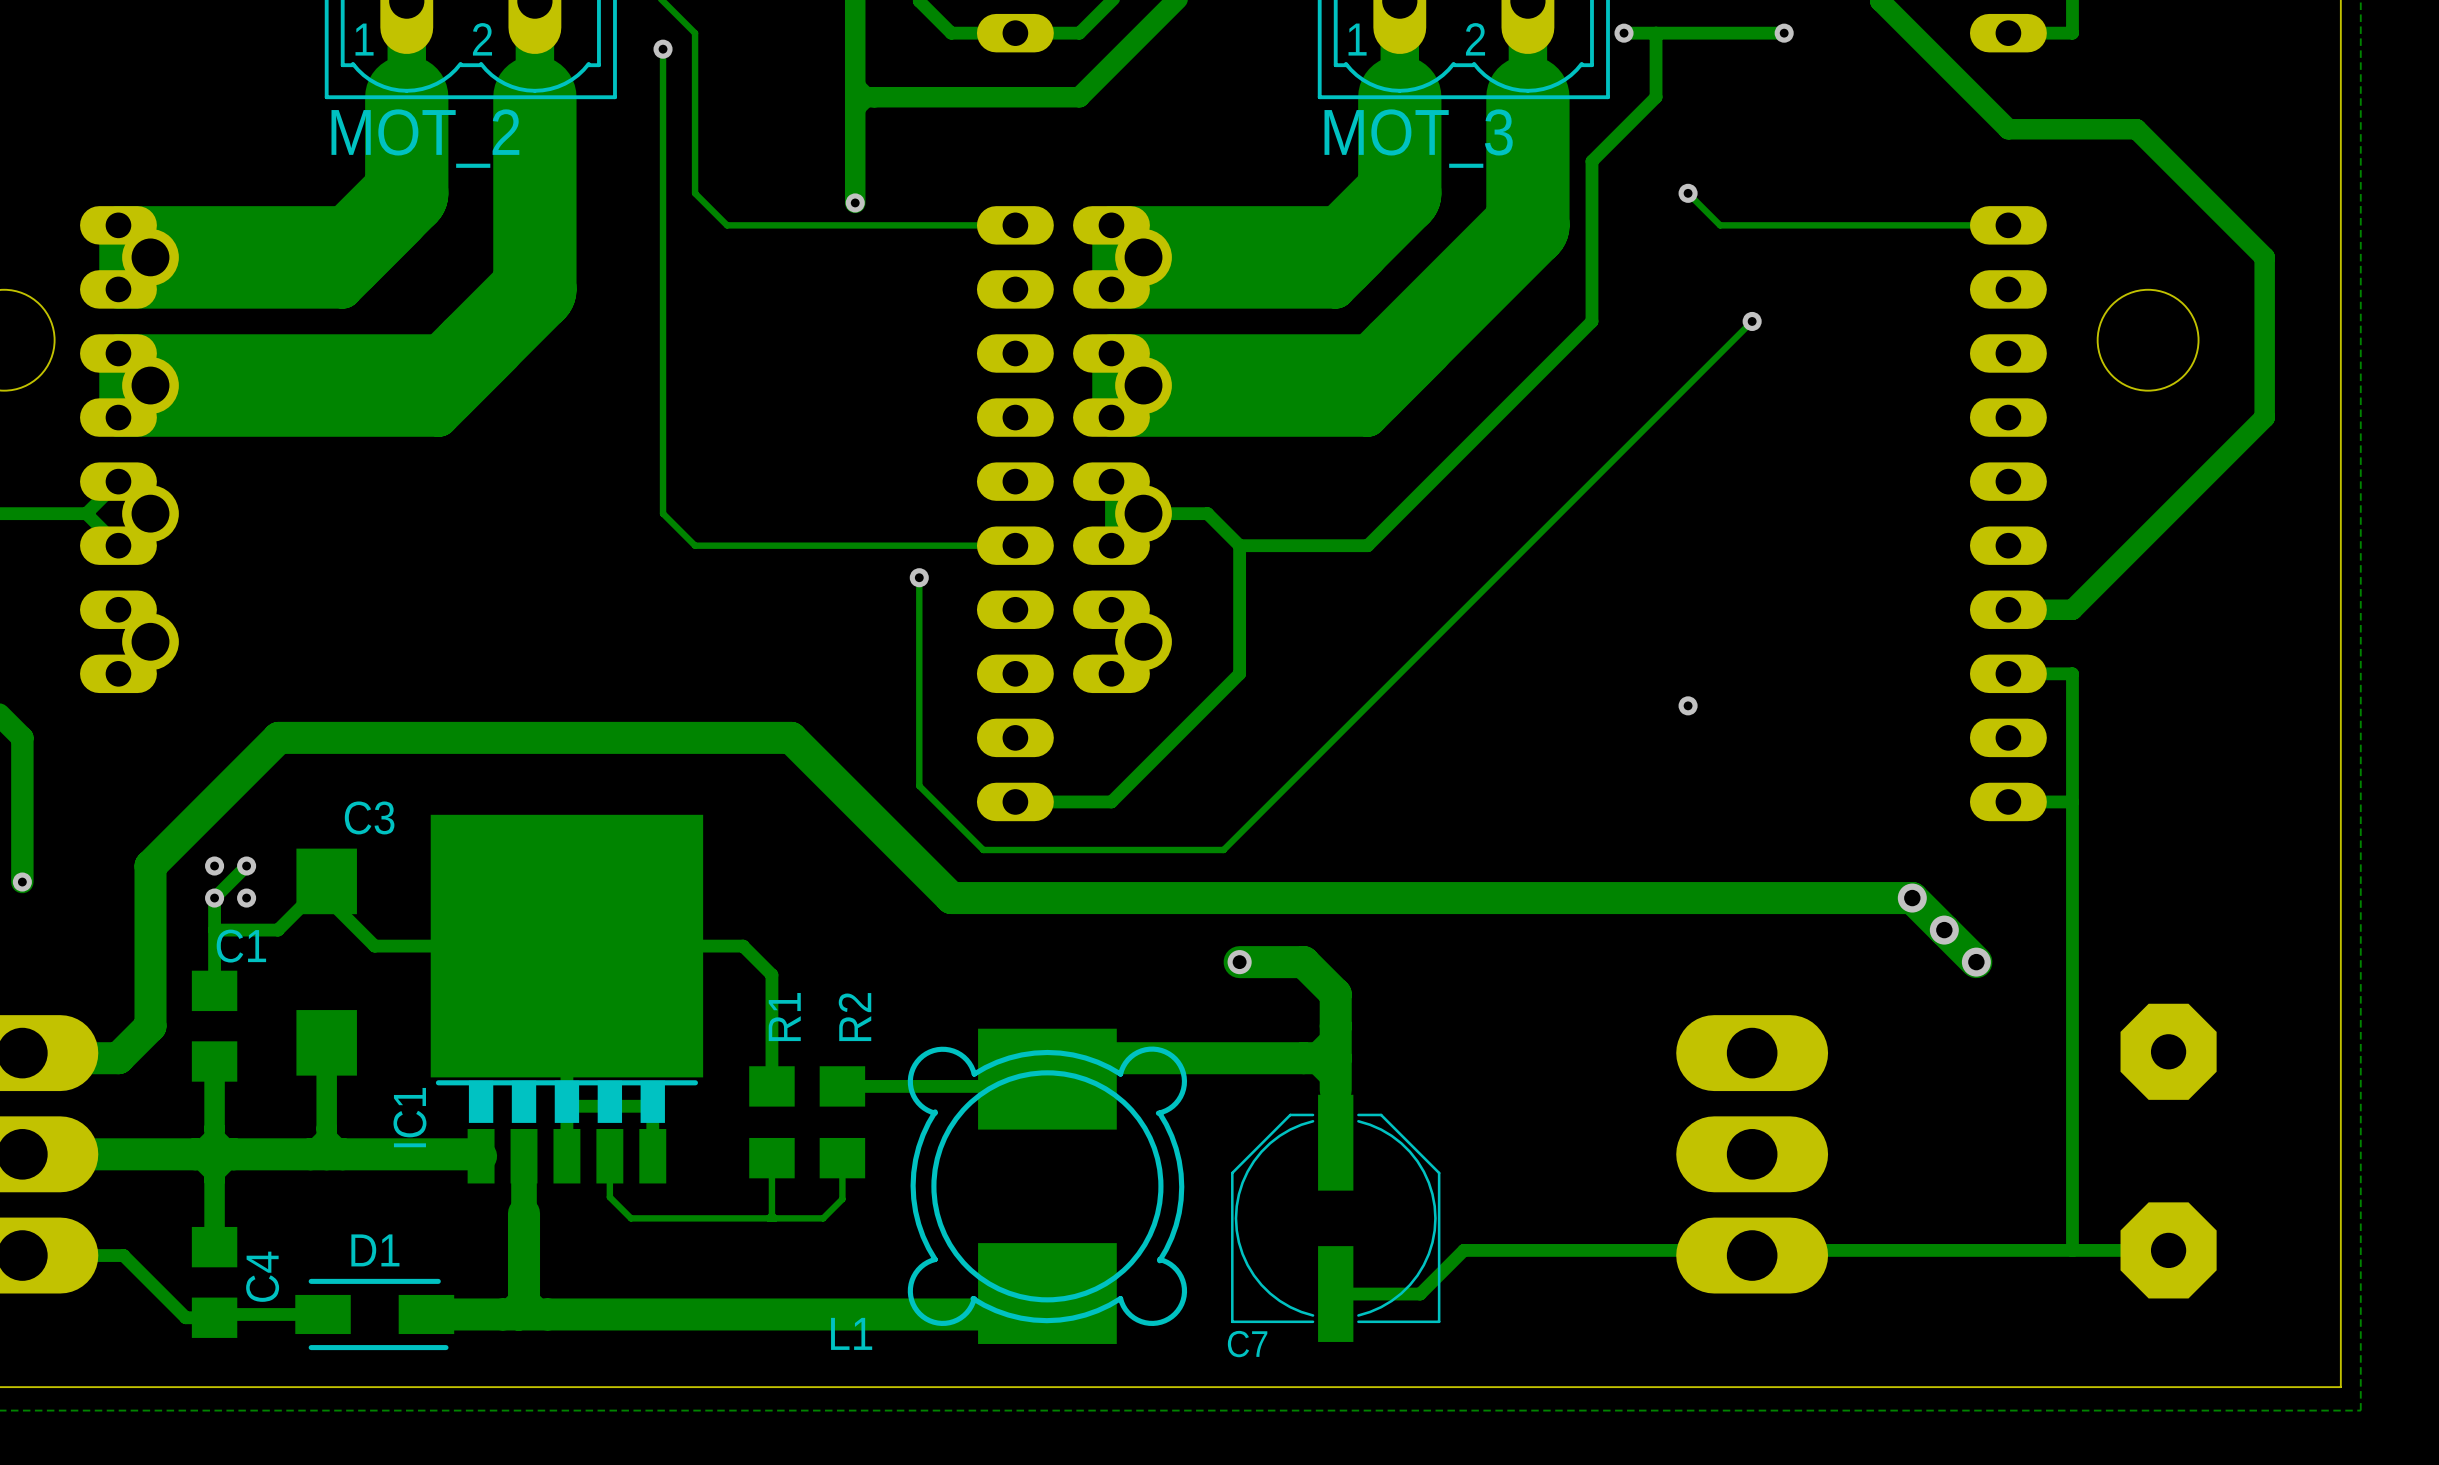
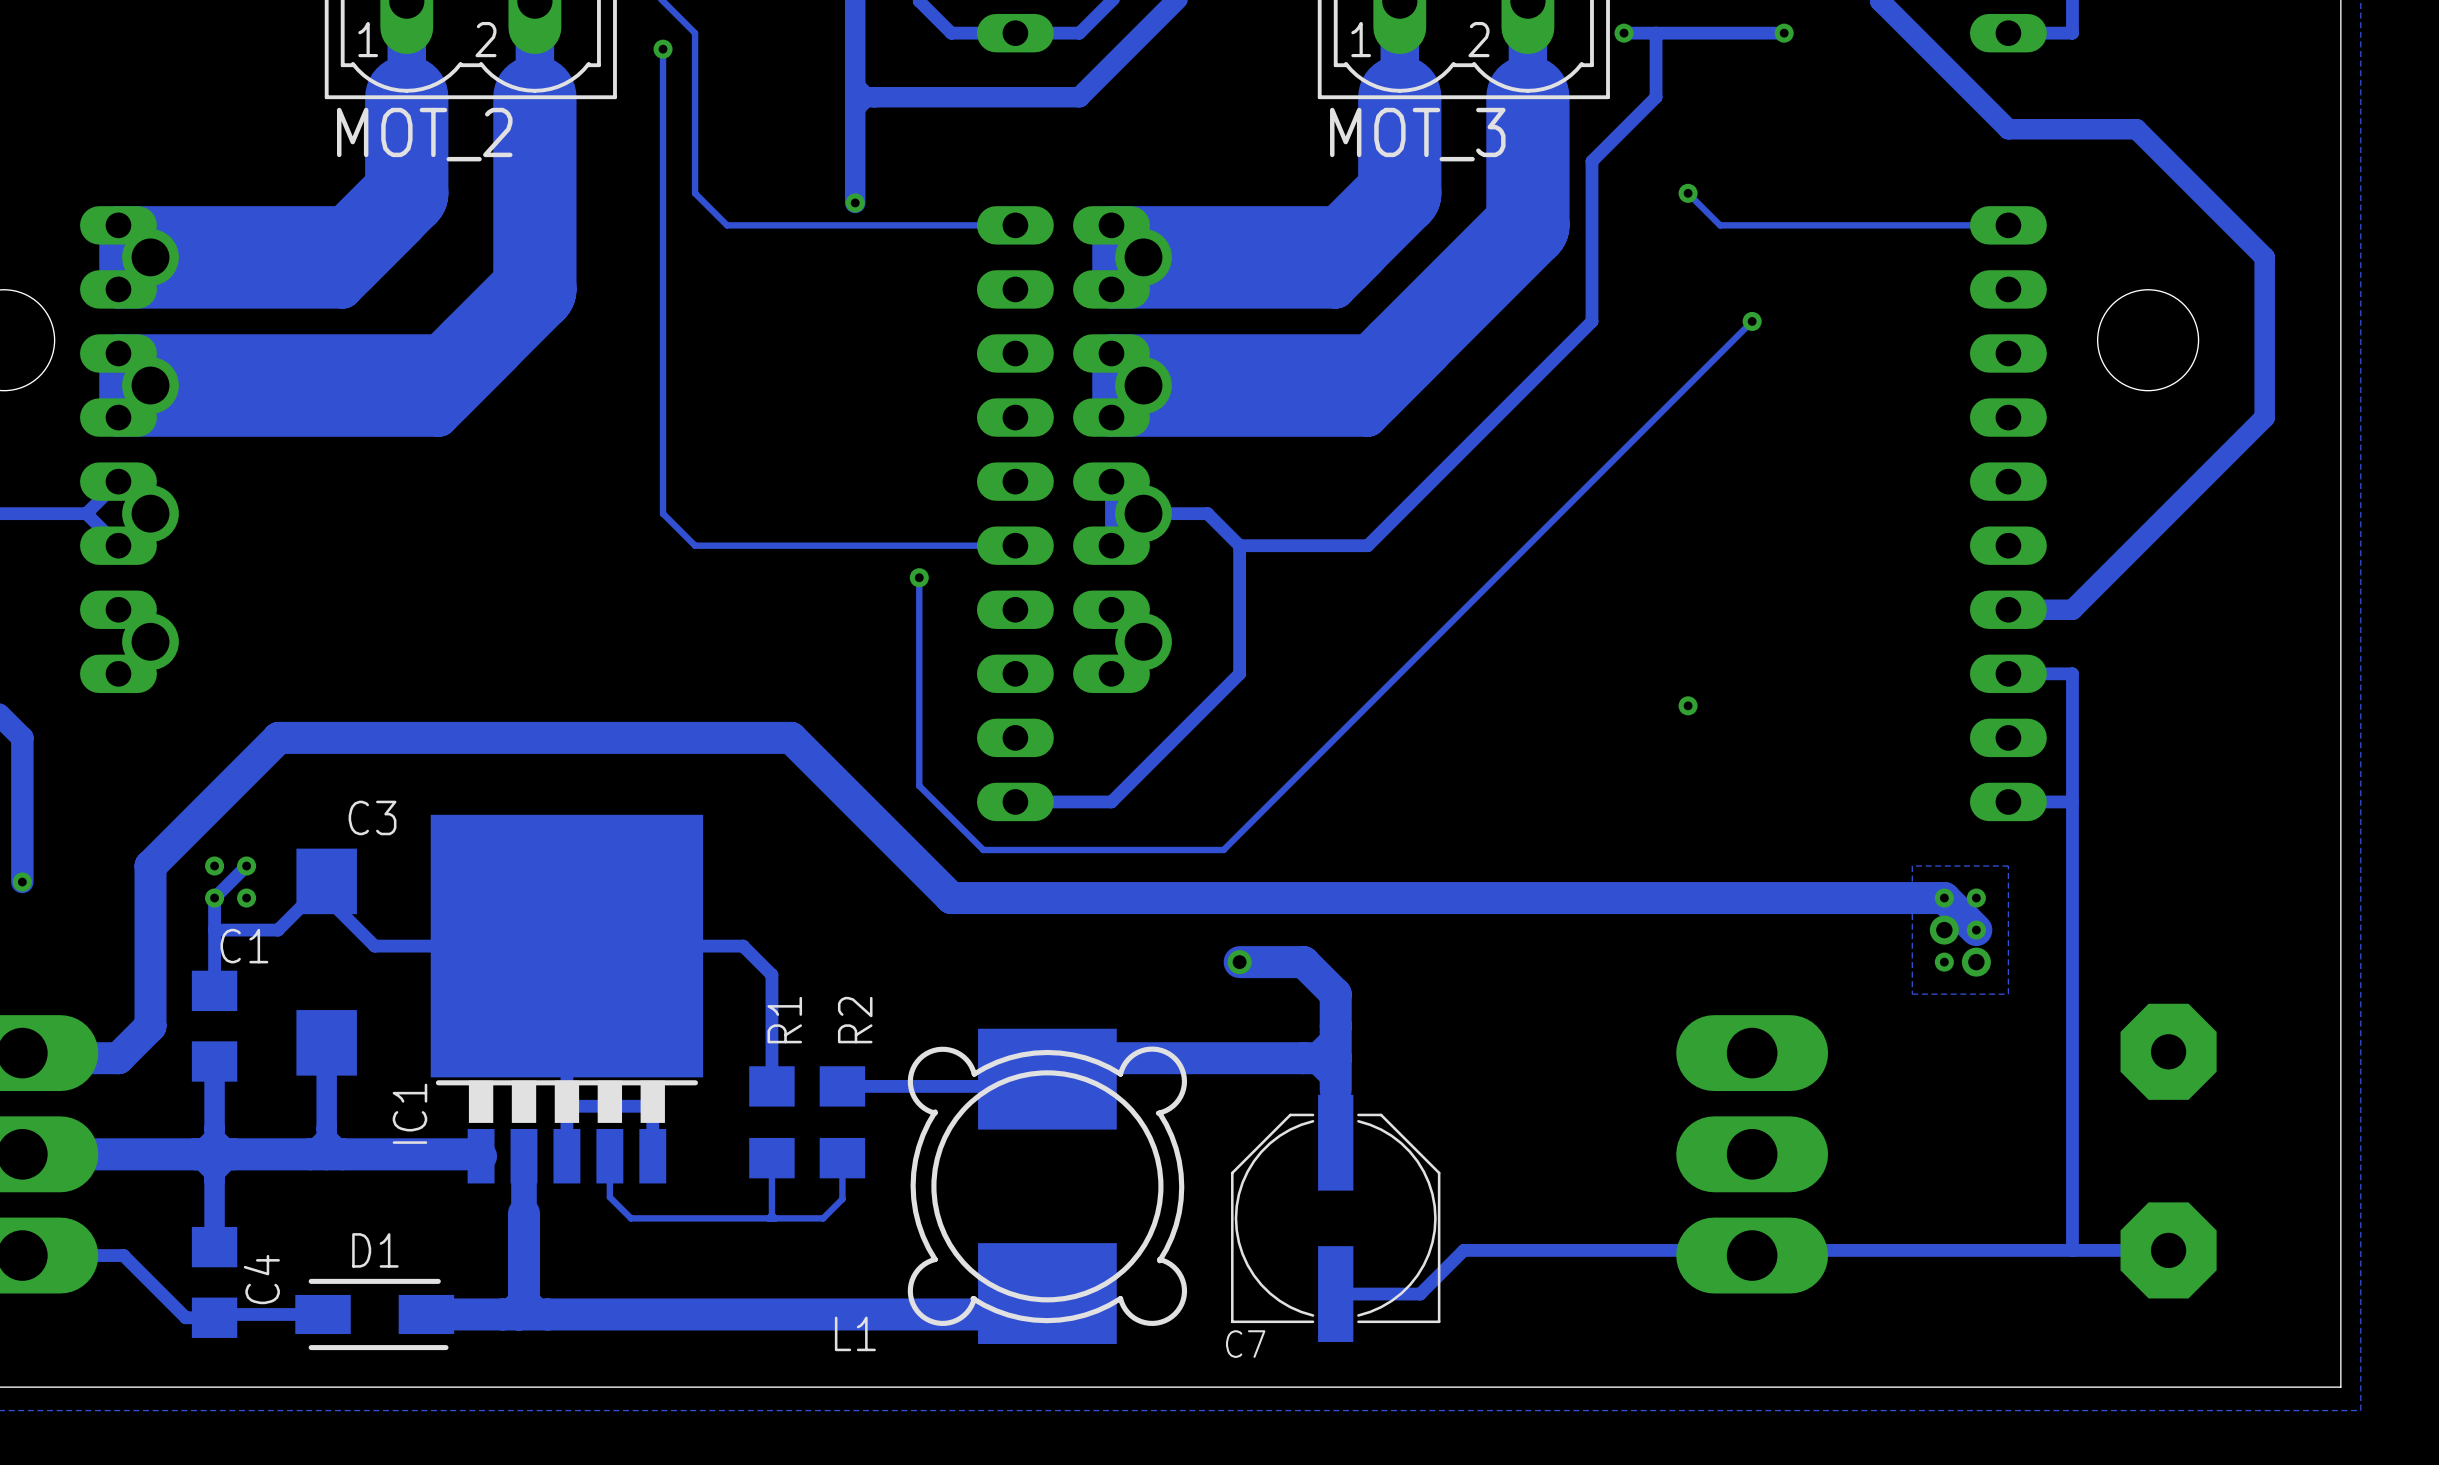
zone outline: none -> (2008, 866) (1912, 866) (1912, 994) (2008, 994) (2008, 866)
track: (1912, 898) (1976, 962) -> (1912, 898) (1944, 898) (1976, 930)
via: (1912, 898) -> none
via: none -> (1944, 898)
via: none -> (1976, 898)
via: none -> (1976, 930)
via: none -> (1944, 962)

